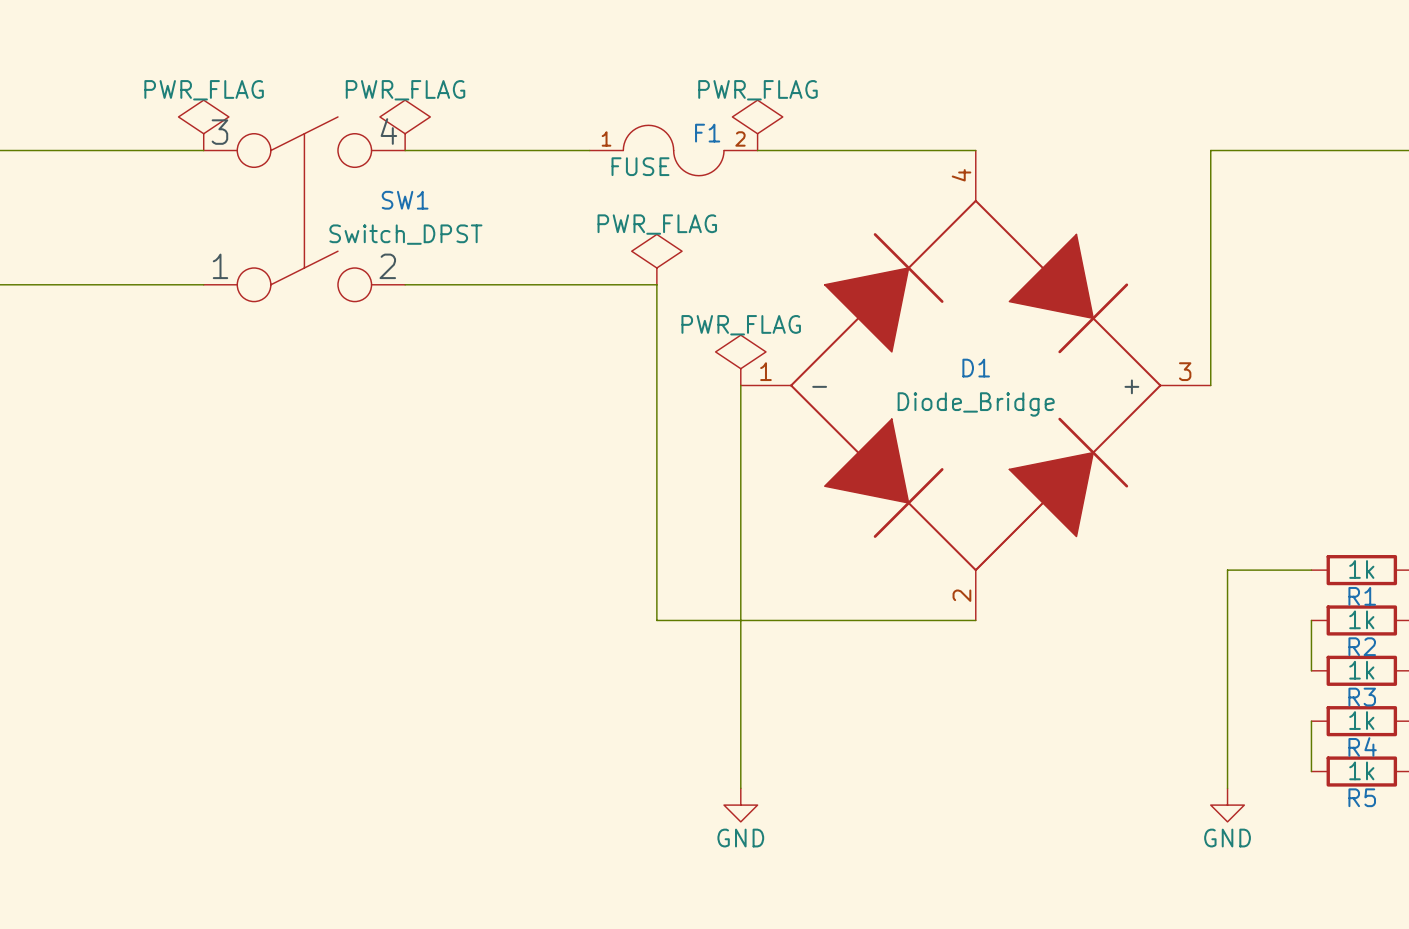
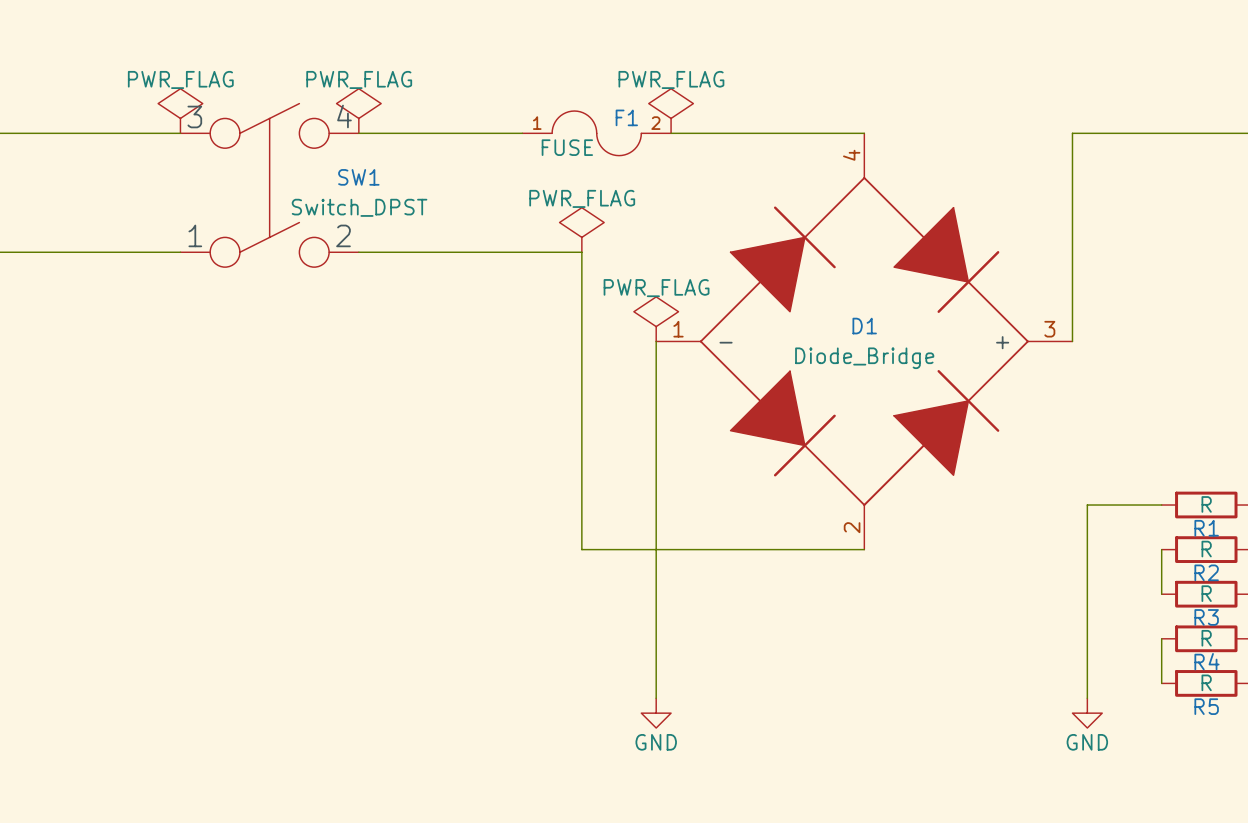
R1 value: 1k (1361, 569) -> R (1206, 504)
R2 value: 1k (1361, 619) -> R (1206, 549)
R3 value: 1k (1361, 670) -> R (1206, 593)
R4 value: 1k (1361, 720) -> R (1206, 638)
R5 value: 1k (1361, 770) -> R (1206, 682)

